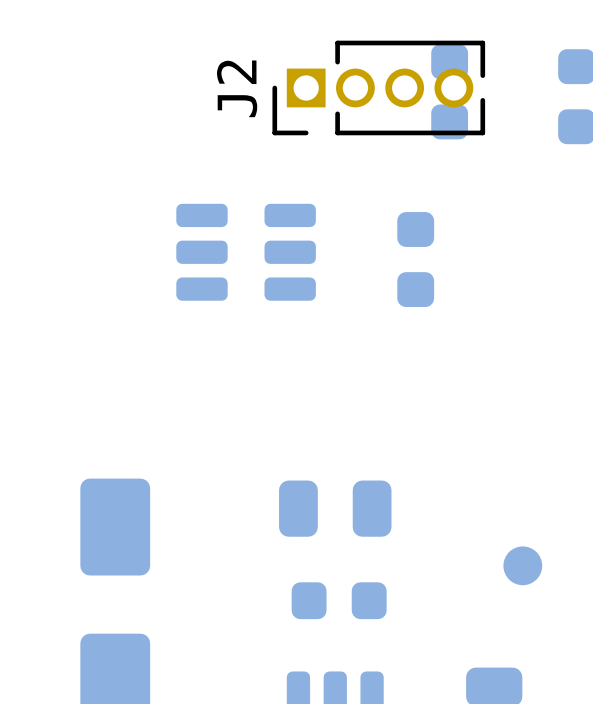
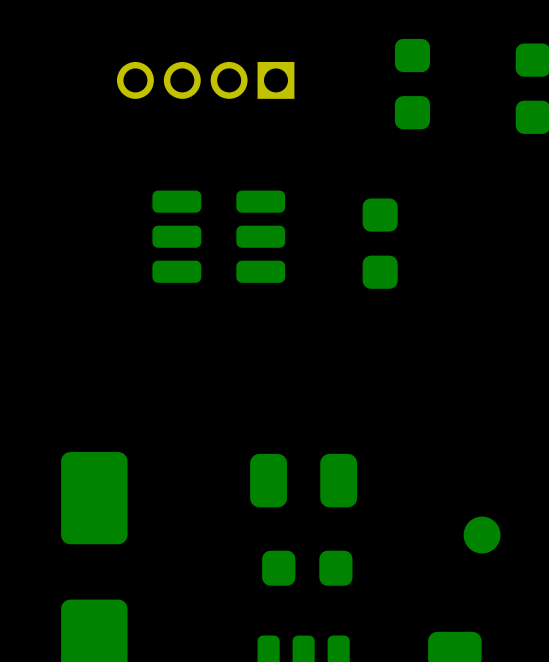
J2 side: top (378, 87) -> bottom (205, 80)

